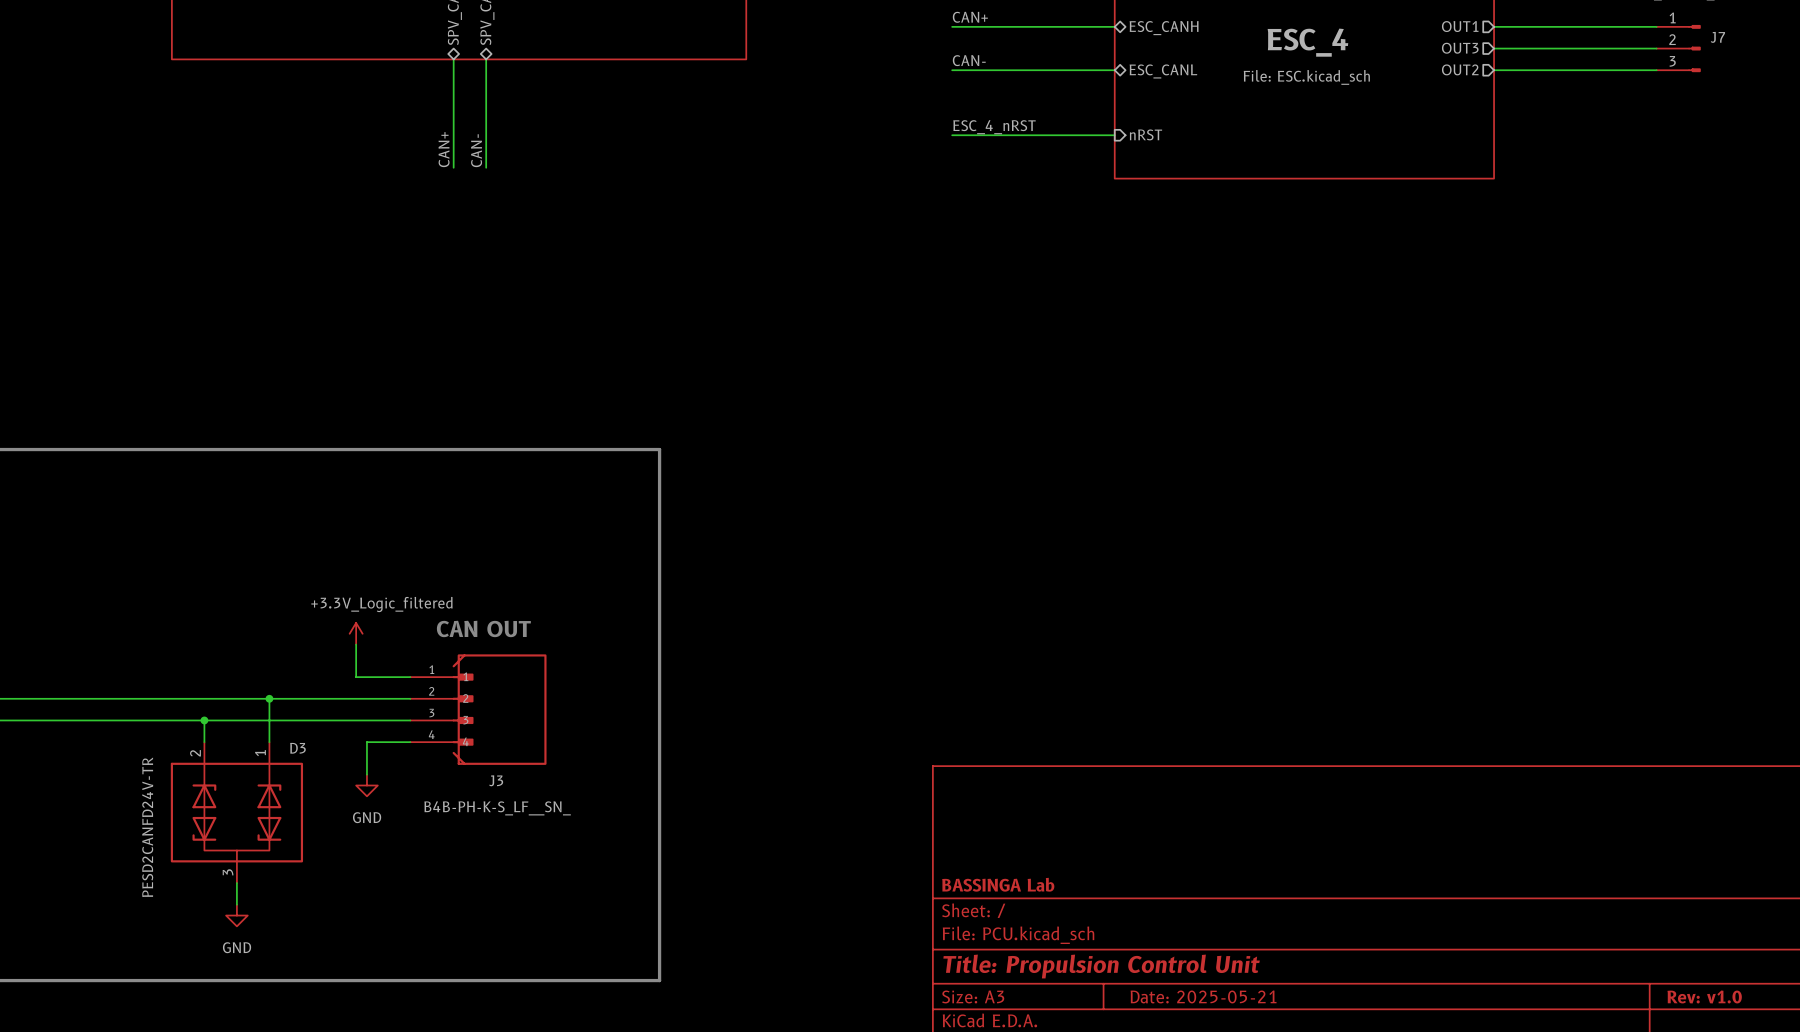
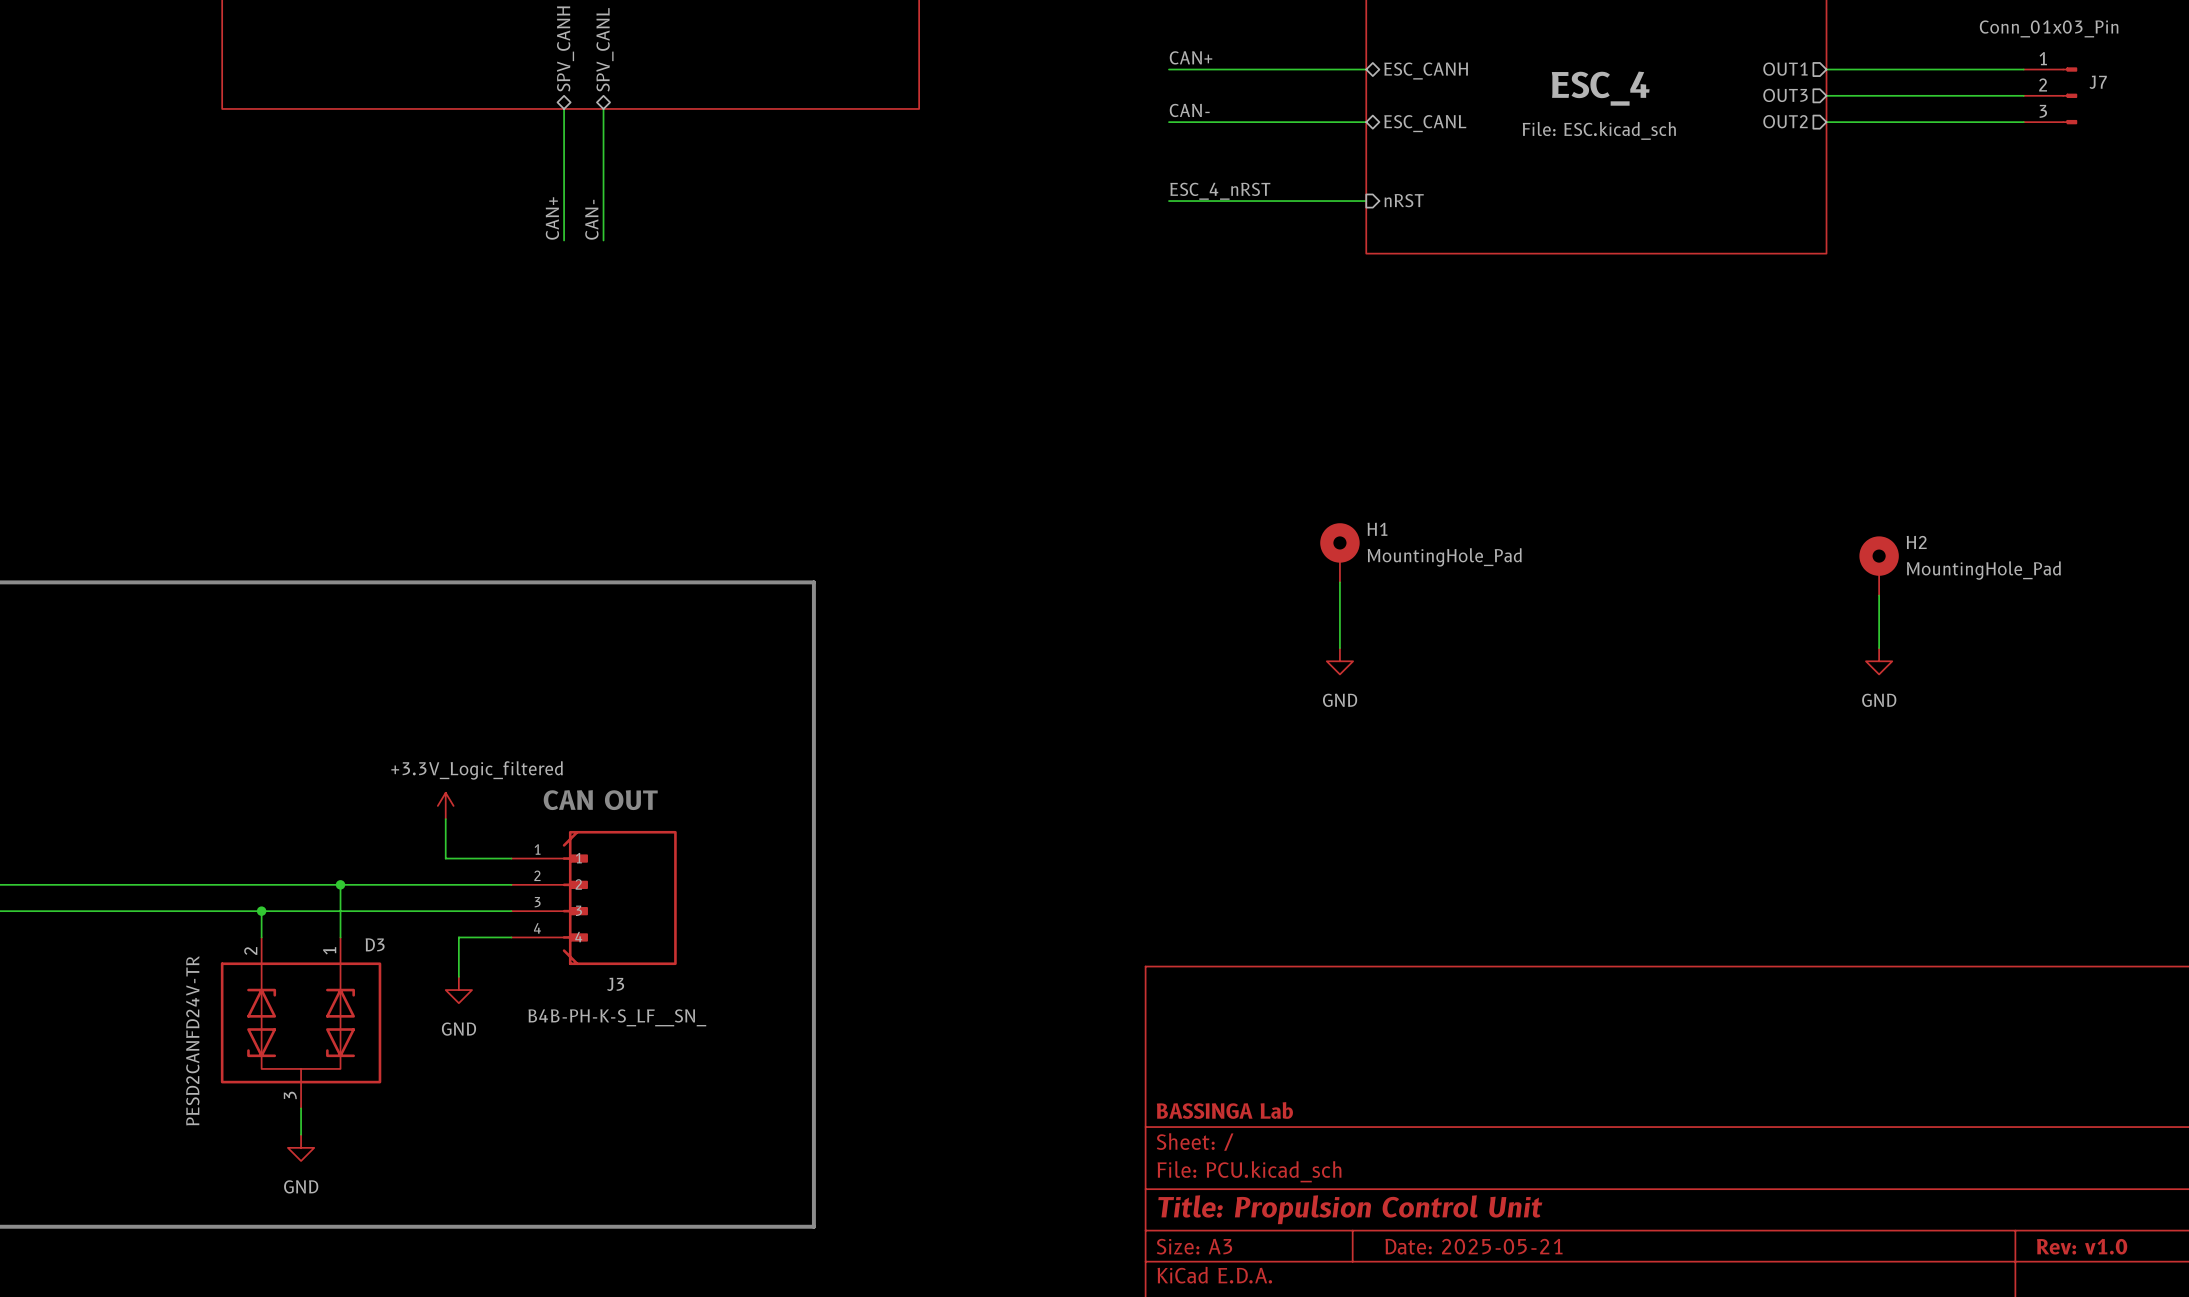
H1: none -> MountingHole_Pad (1339, 552)
H2: none -> MountingHole_Pad (1879, 565)
wire: none -> (1339, 582) (1339, 648)
wire: none -> (1879, 595) (1879, 648)
power symbol: none -> GND (1339, 661)
power symbol: none -> GND (1879, 661)

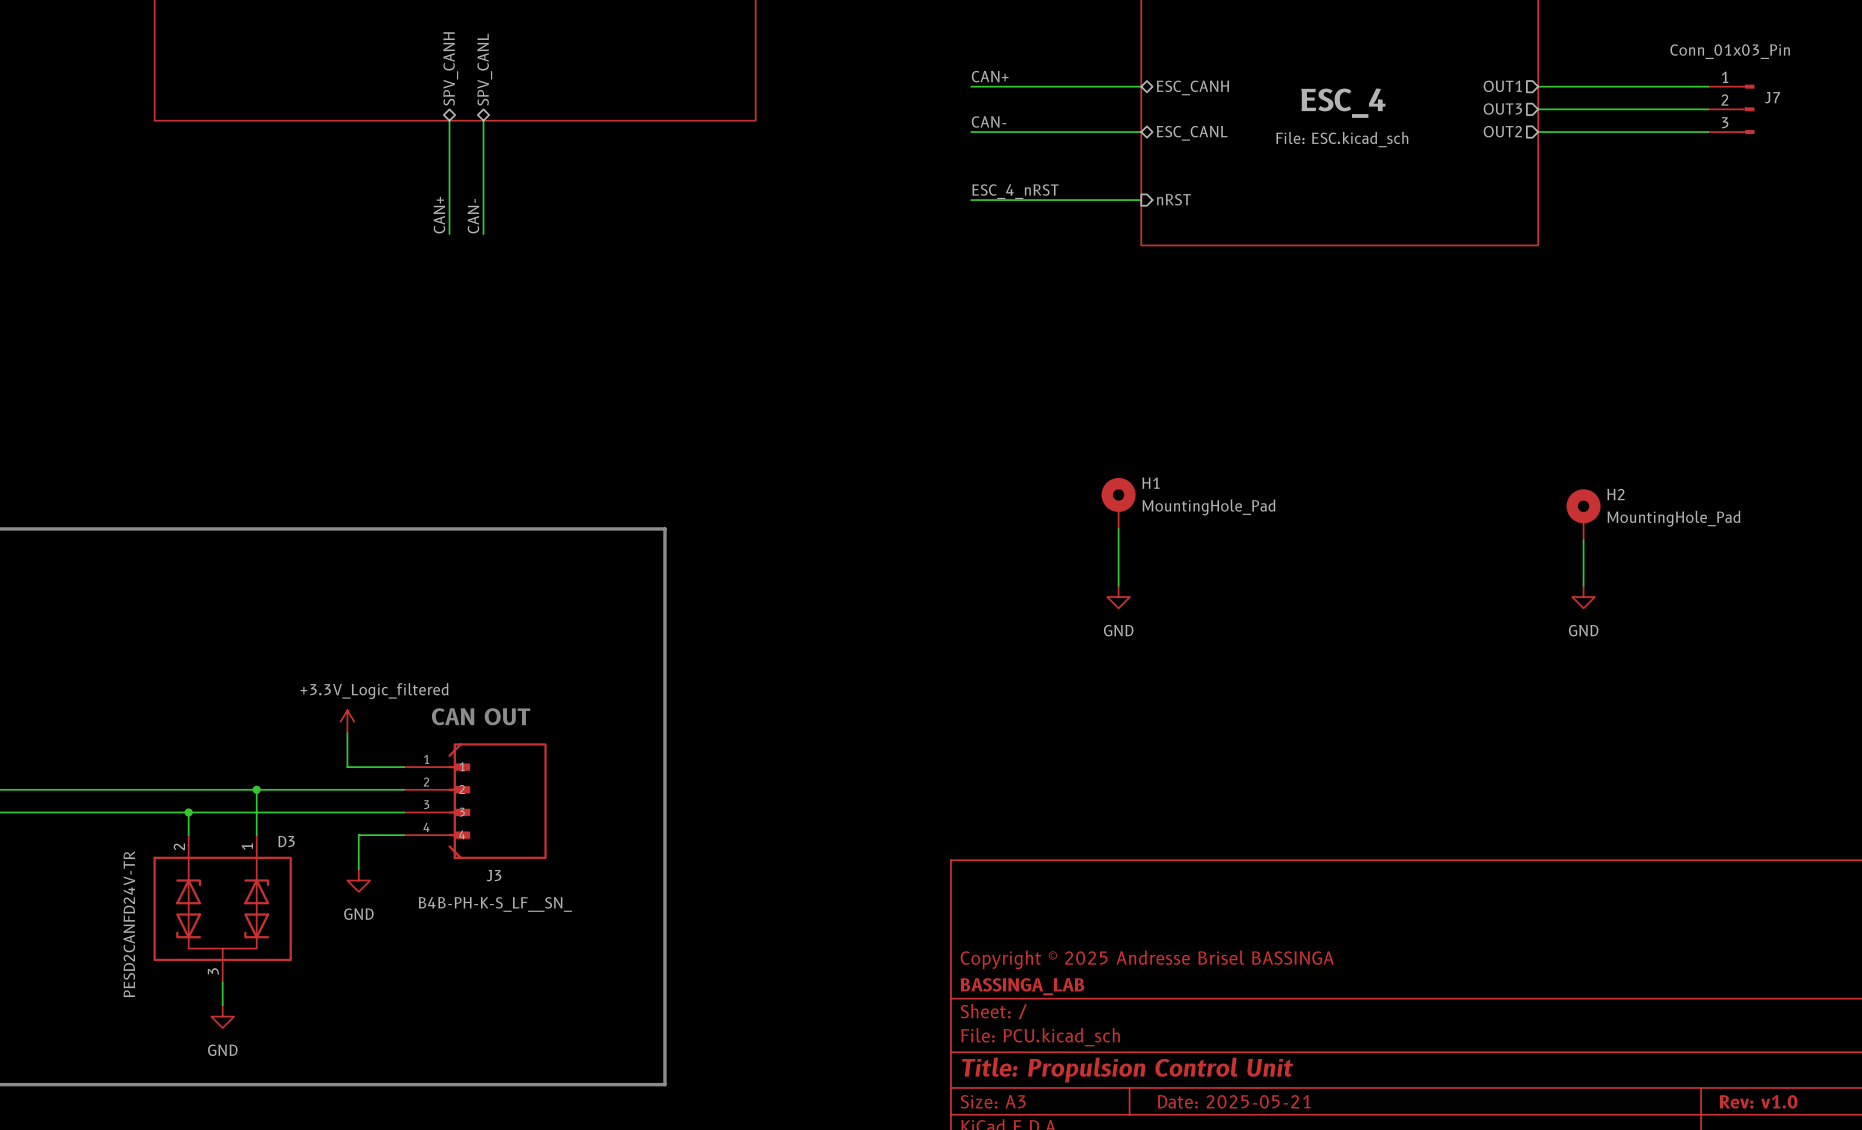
title block: none -> Copyright © 2025 Andresse Brisel BASSINGA (1147, 959)
title block: BASSINGA Lab (1224, 1110) -> BASSINGA_LAB (1022, 986)

